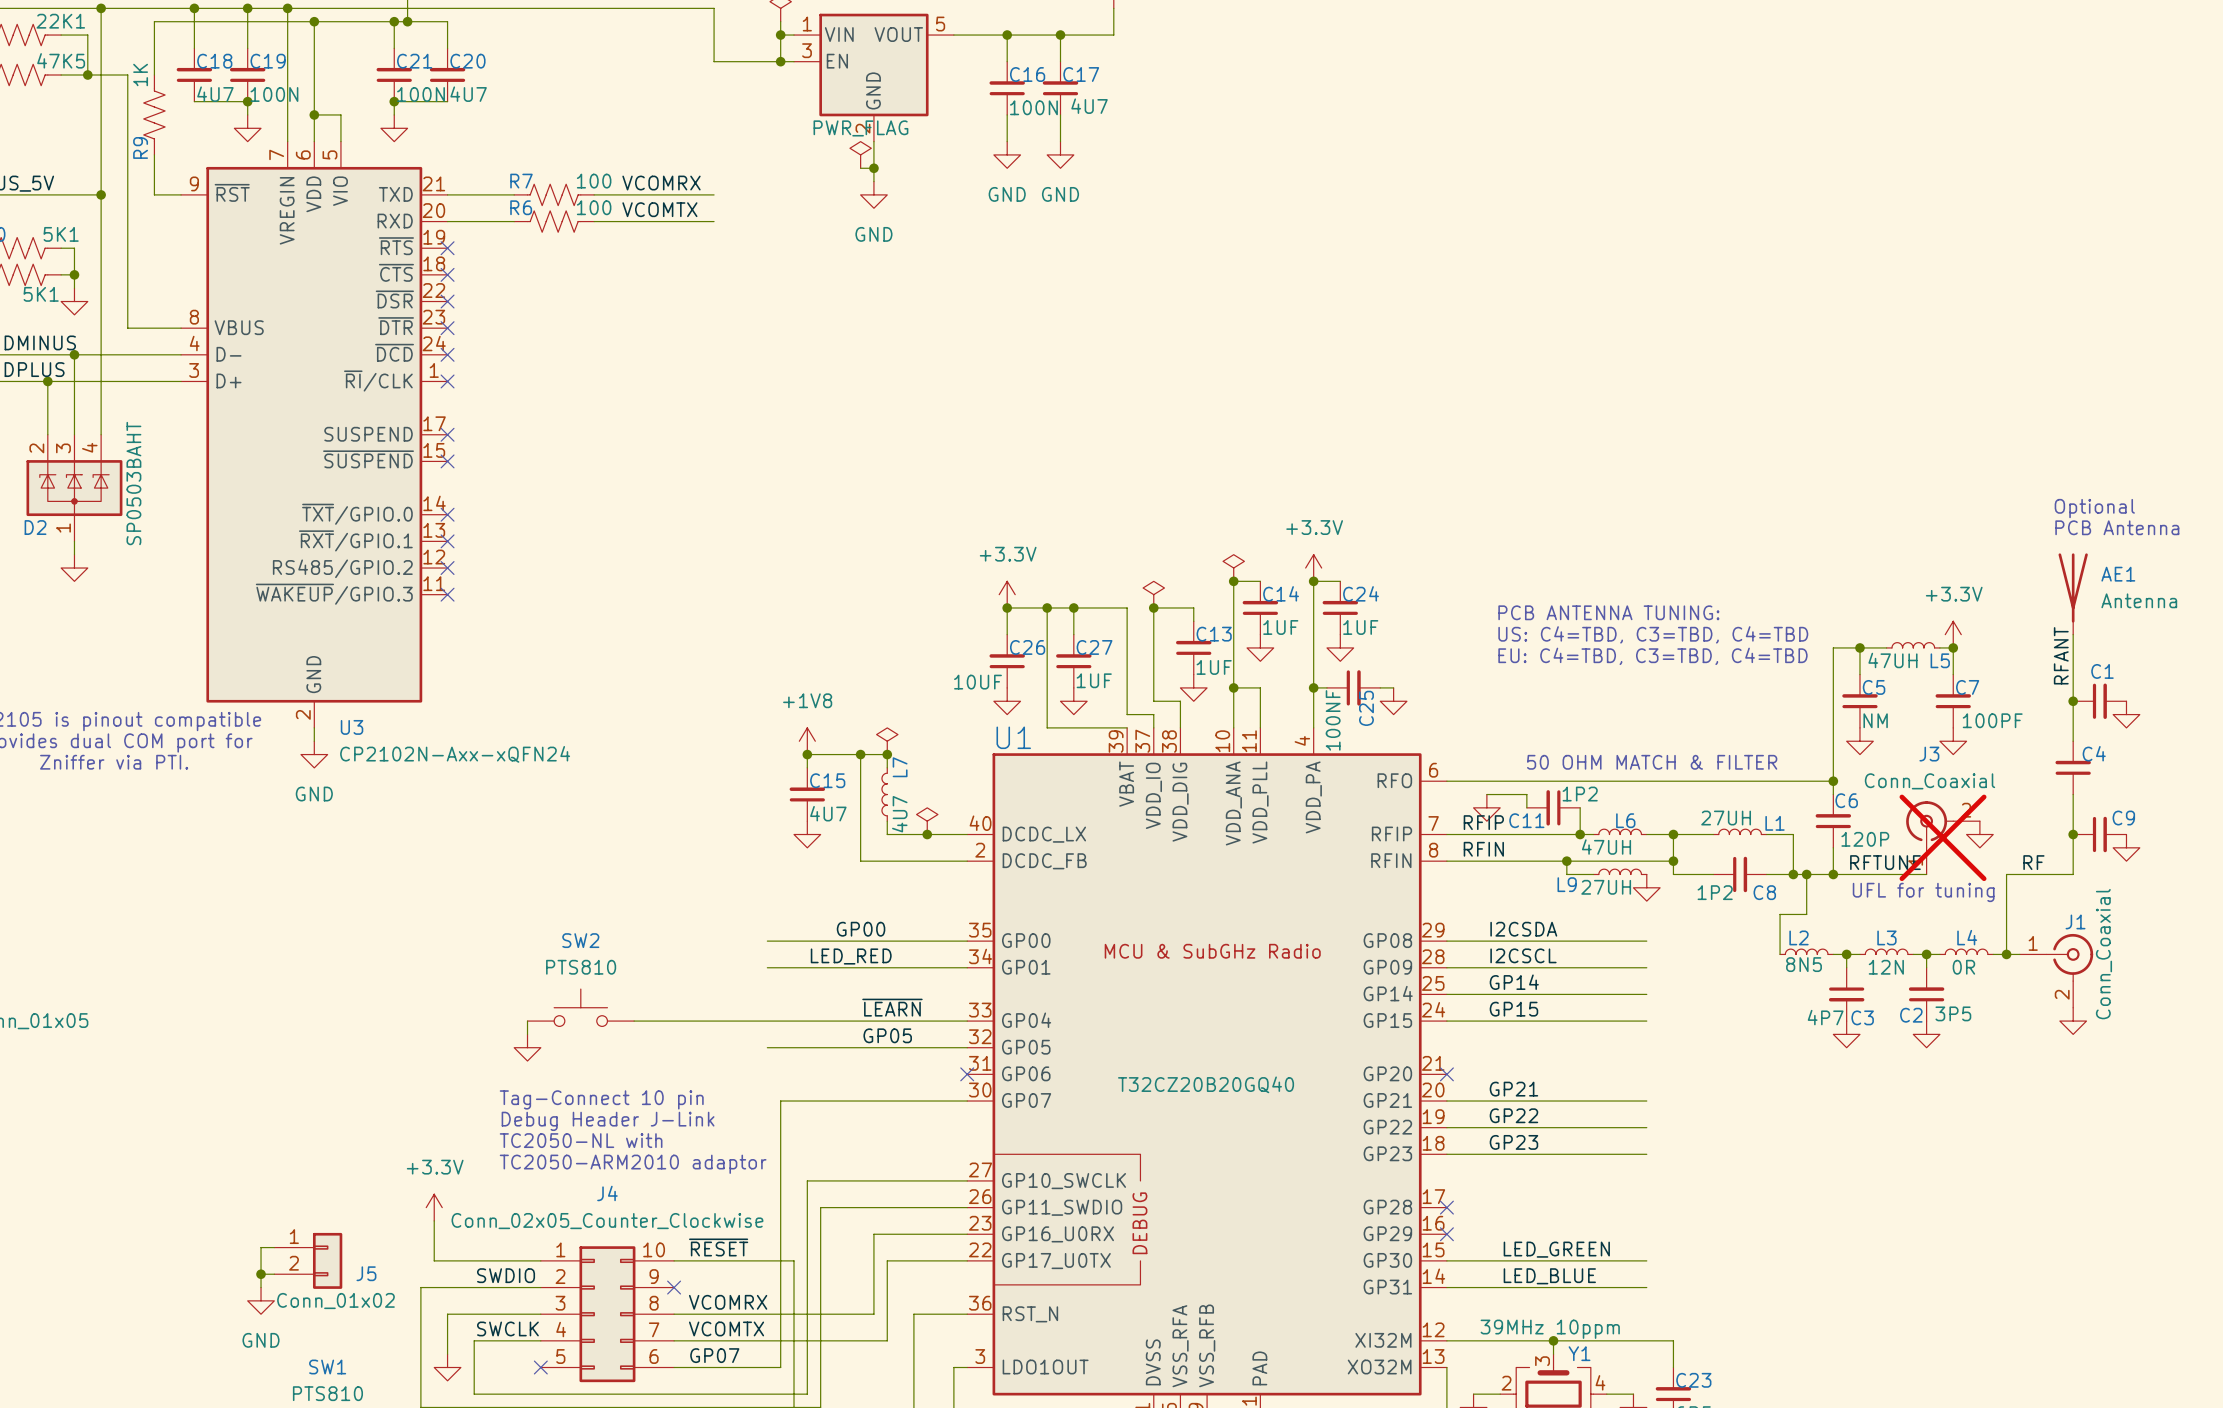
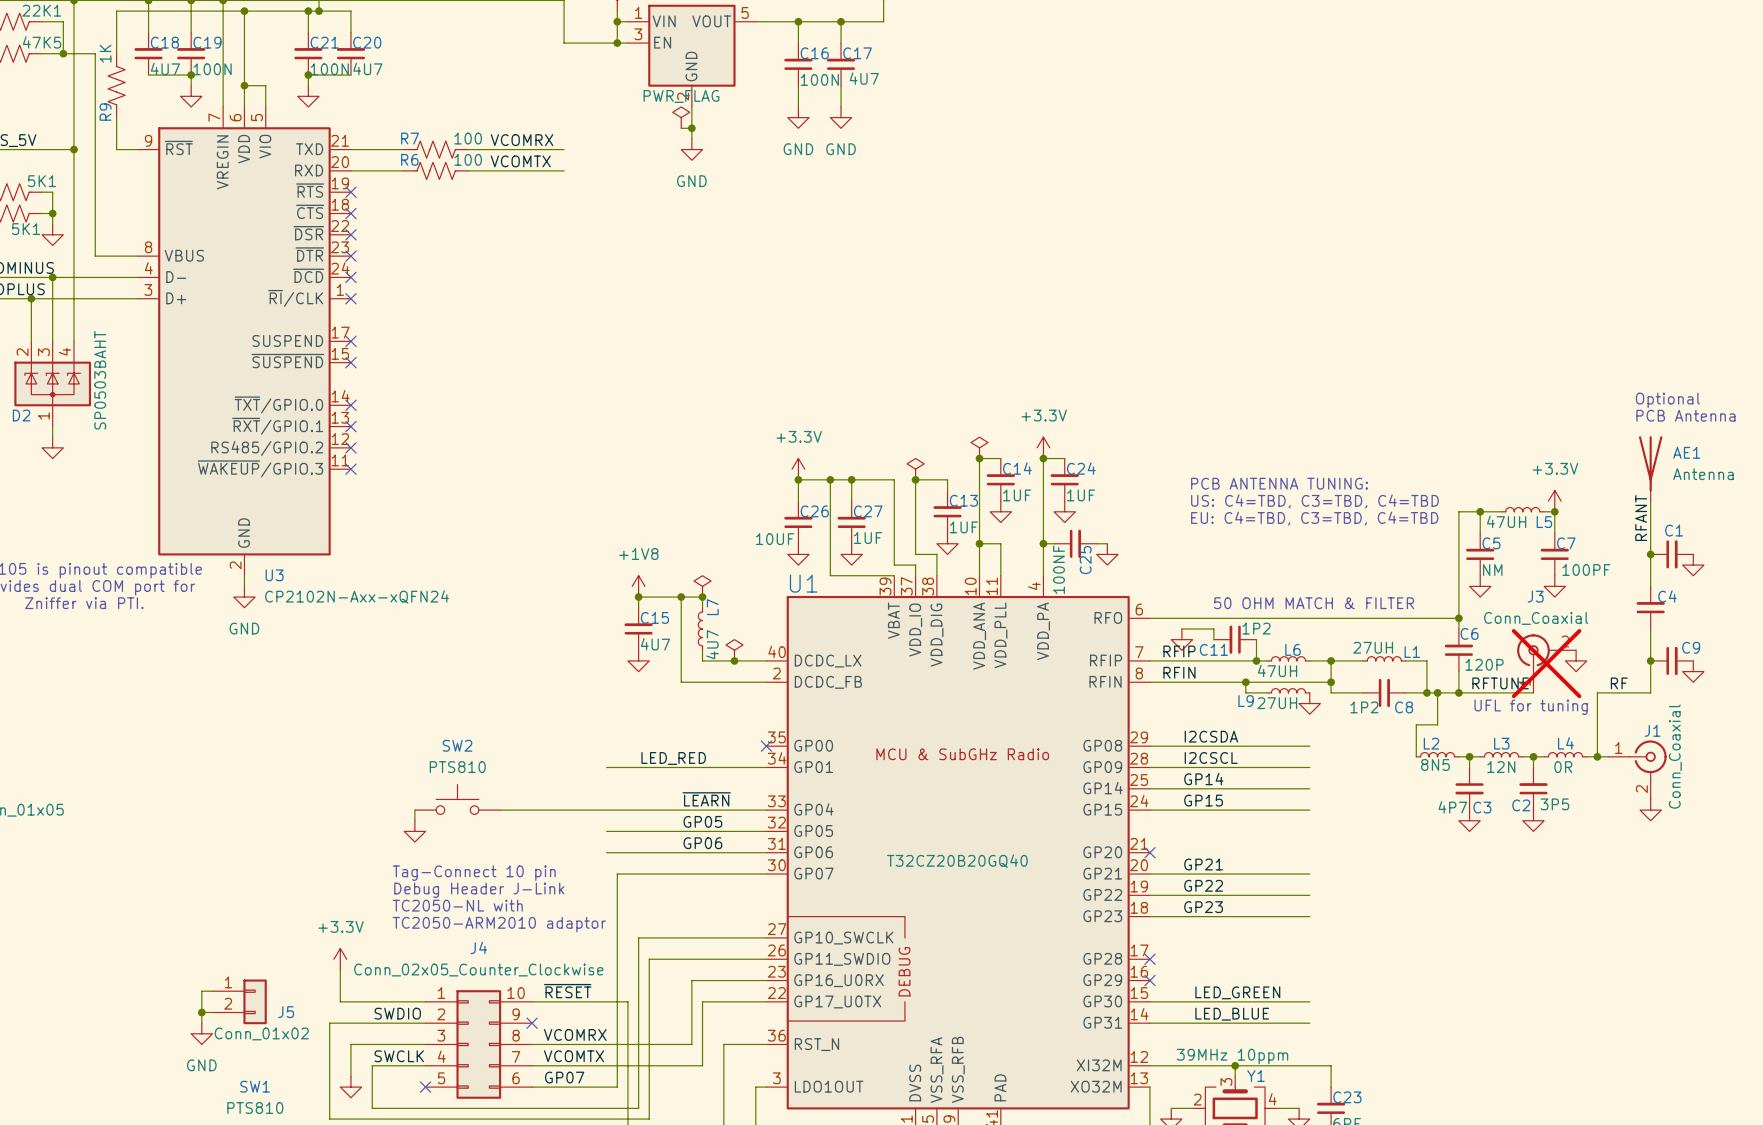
label: GP00 (861, 929) -> none
wire: (767, 941) (967, 941) -> (606, 852) (766, 852)
no-connect mark: none -> (766, 746)
label: none -> GP06 (702, 843)
no-connect mark: (967, 1074) -> none

